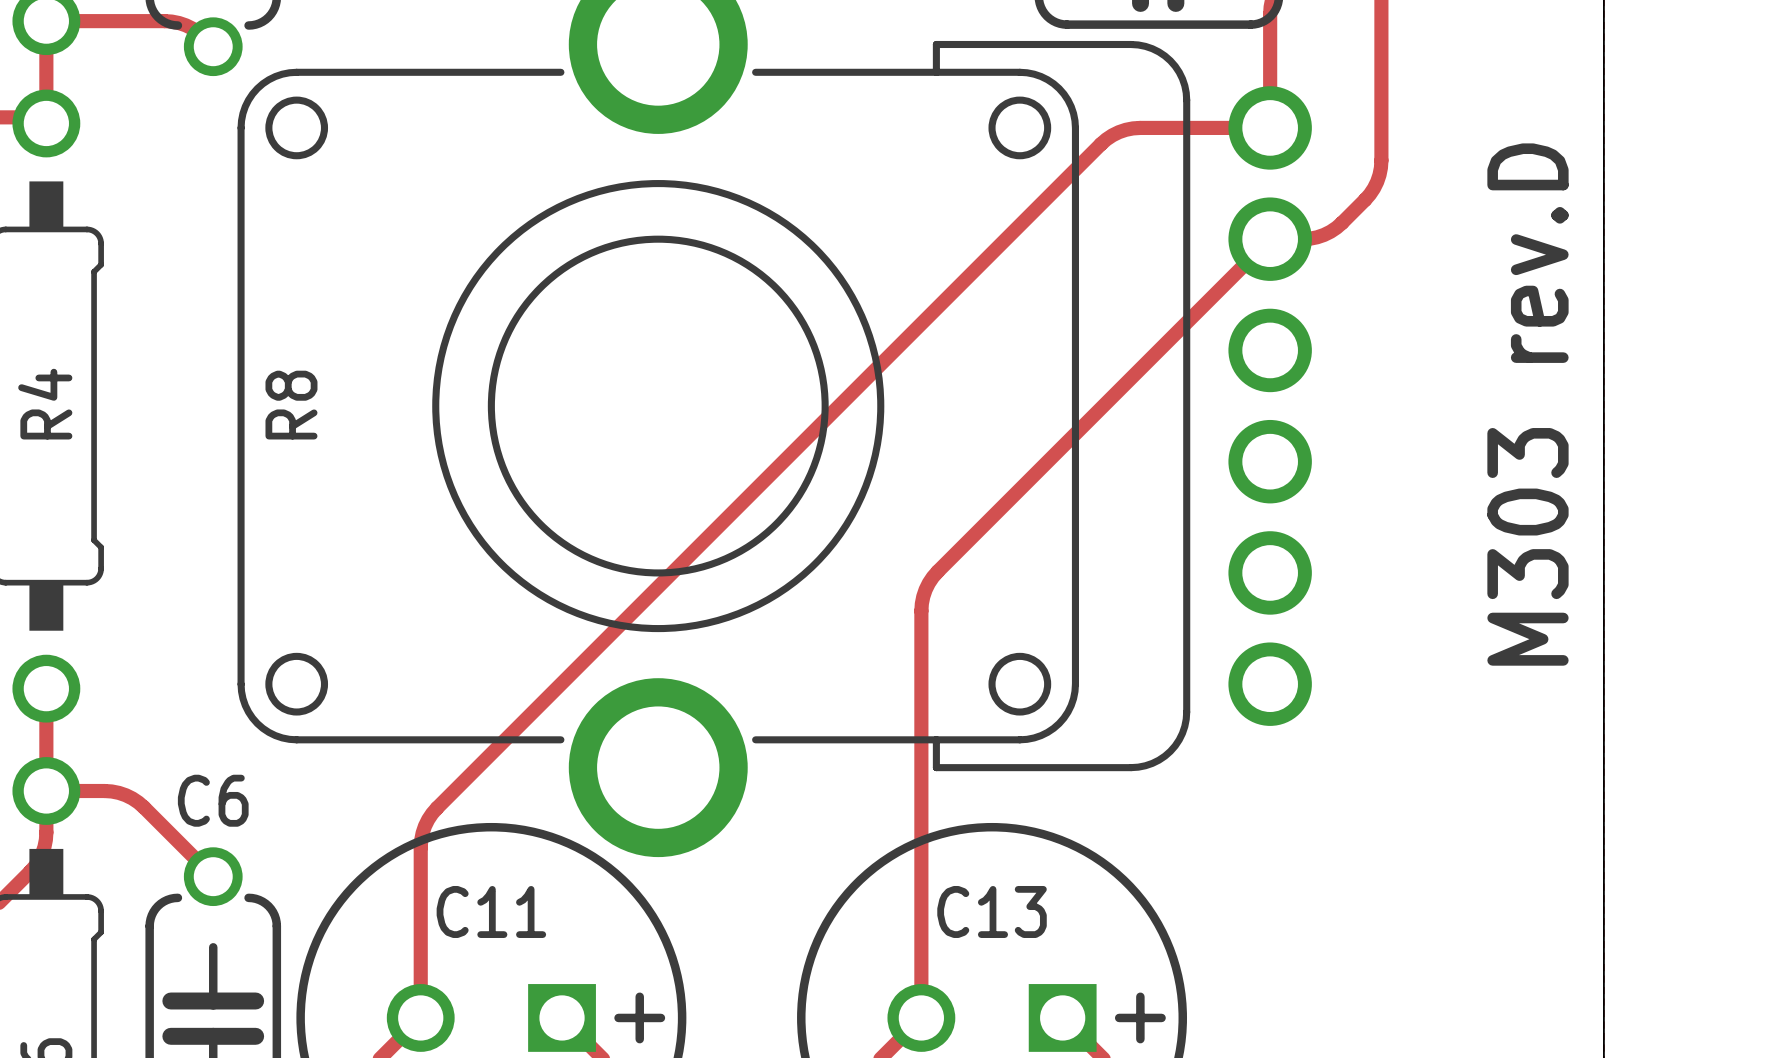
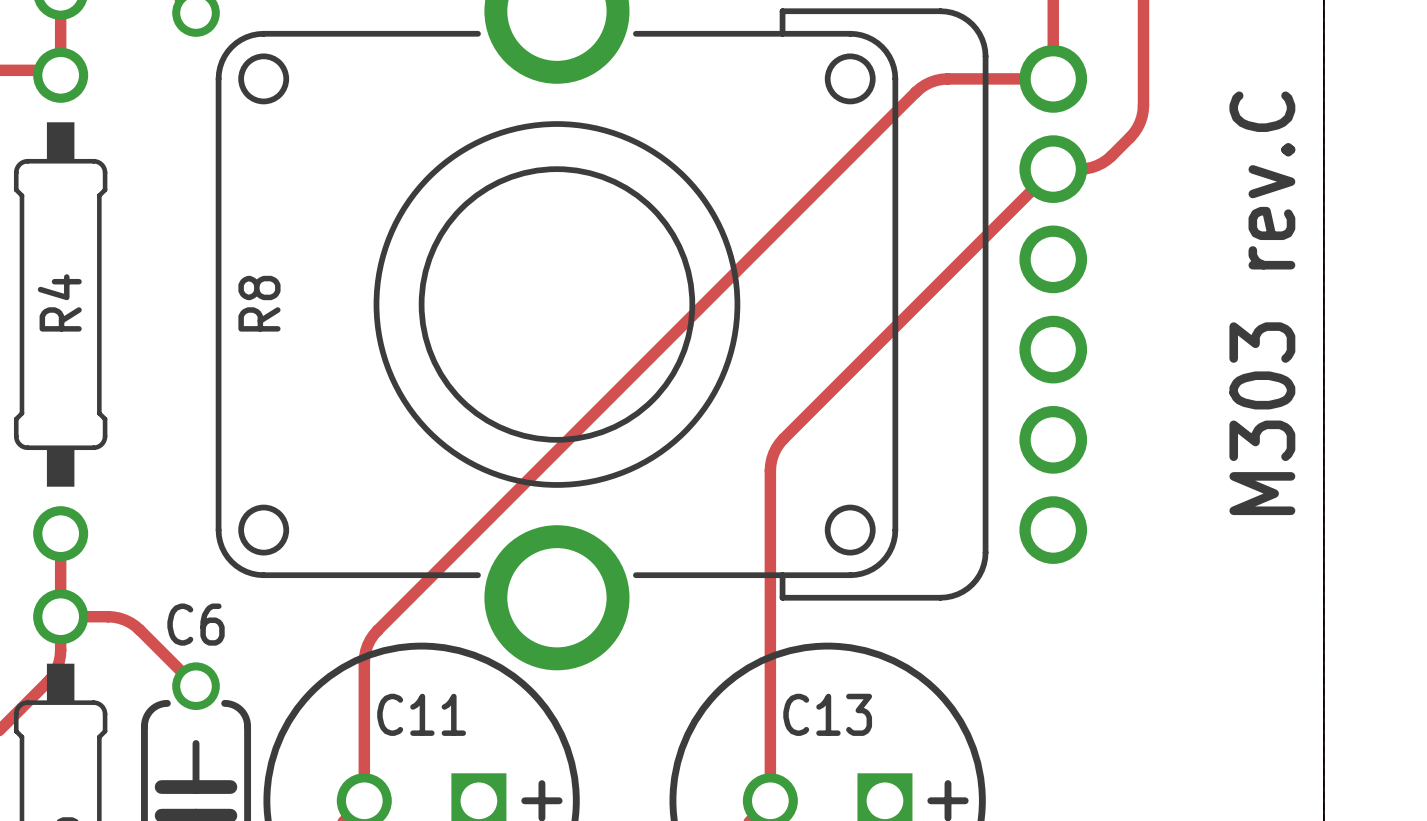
part value: M303 rev.D (1527, 404) -> M303 rev.C (1262, 303)

